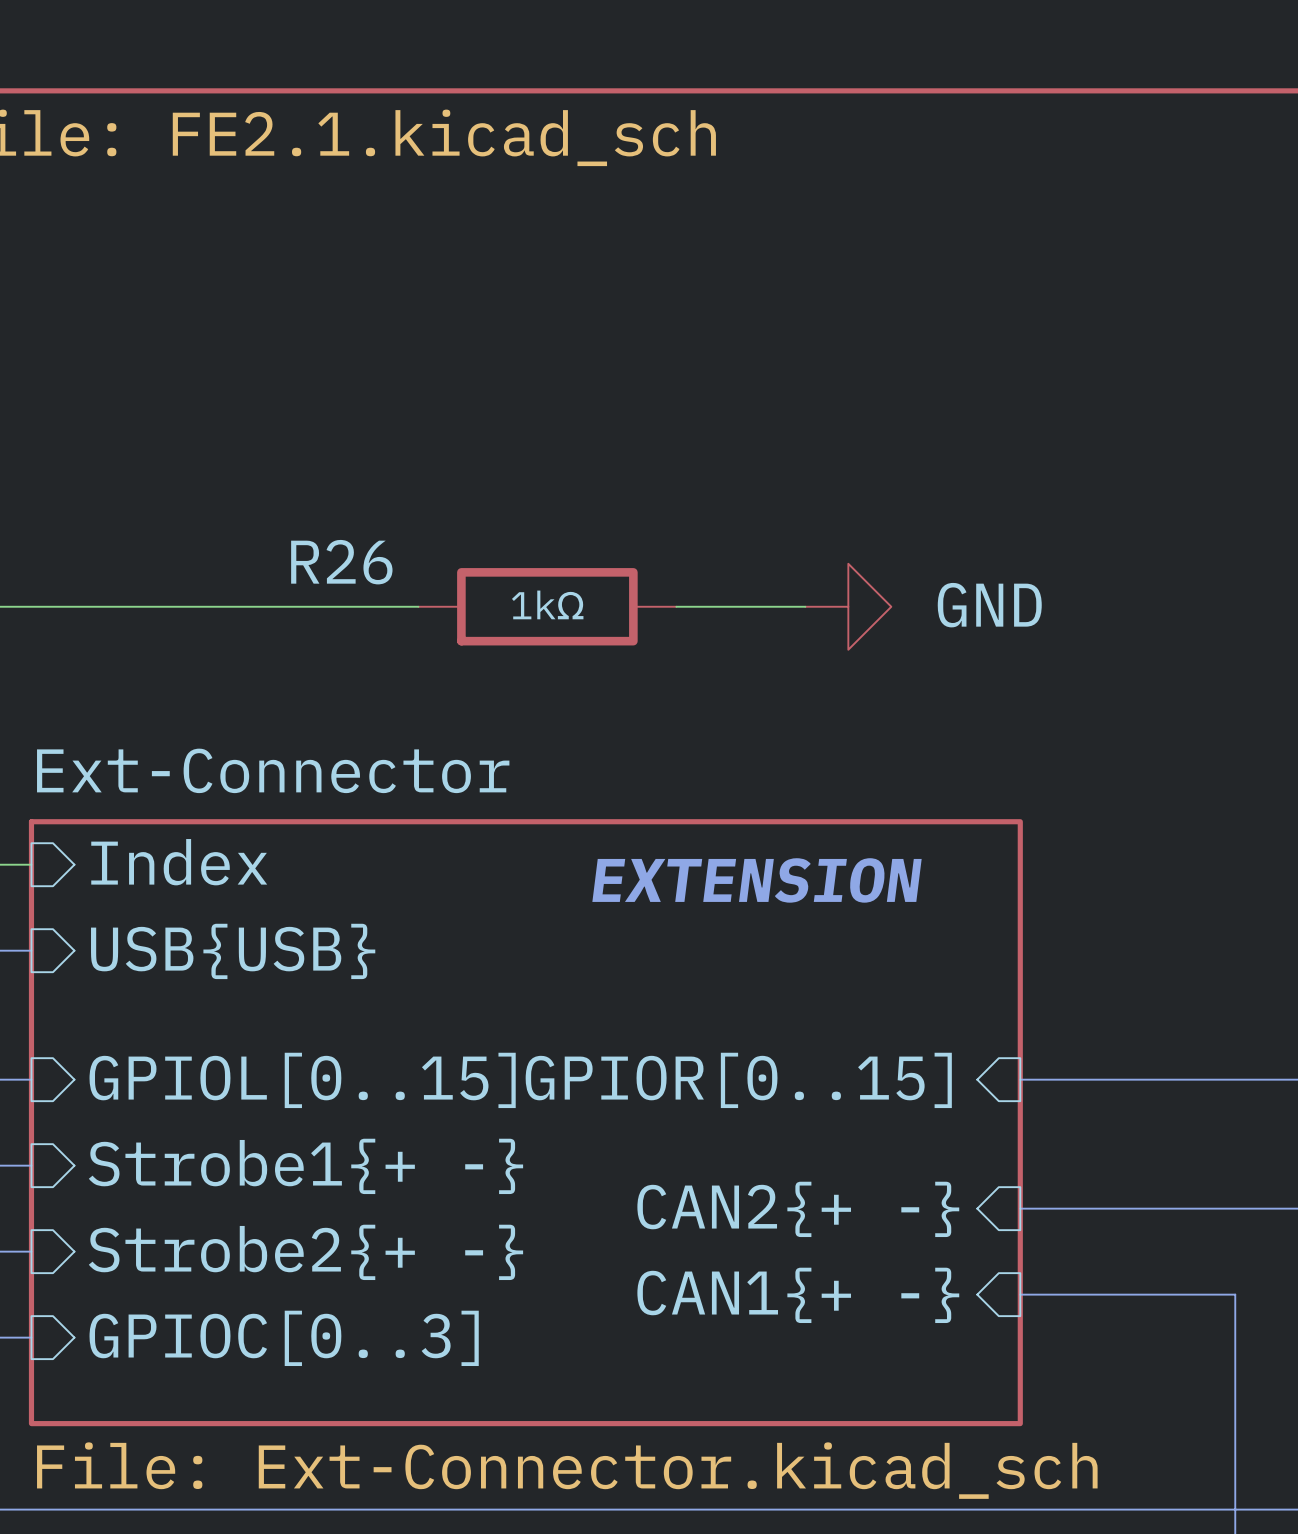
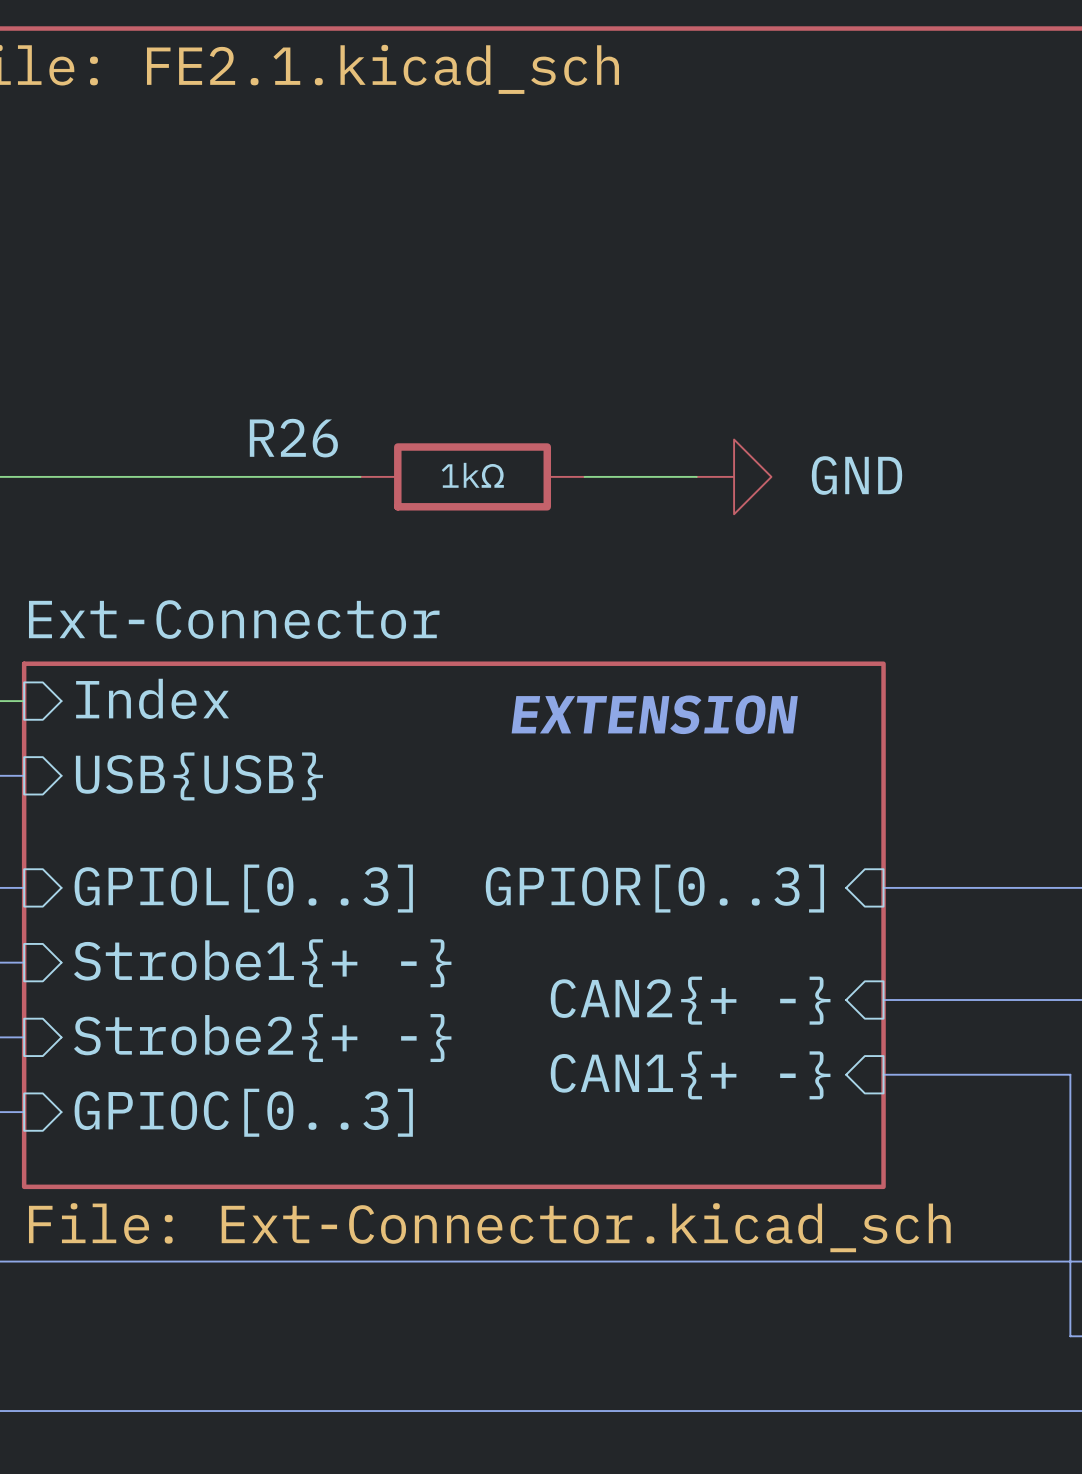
sheet pin: GPIOL[0..15] (302, 1080) -> GPIOL[0..3] (243, 888)
sheet pin: GPIOR[0..15] (738, 1080) -> GPIOR[0..3] (654, 888)

